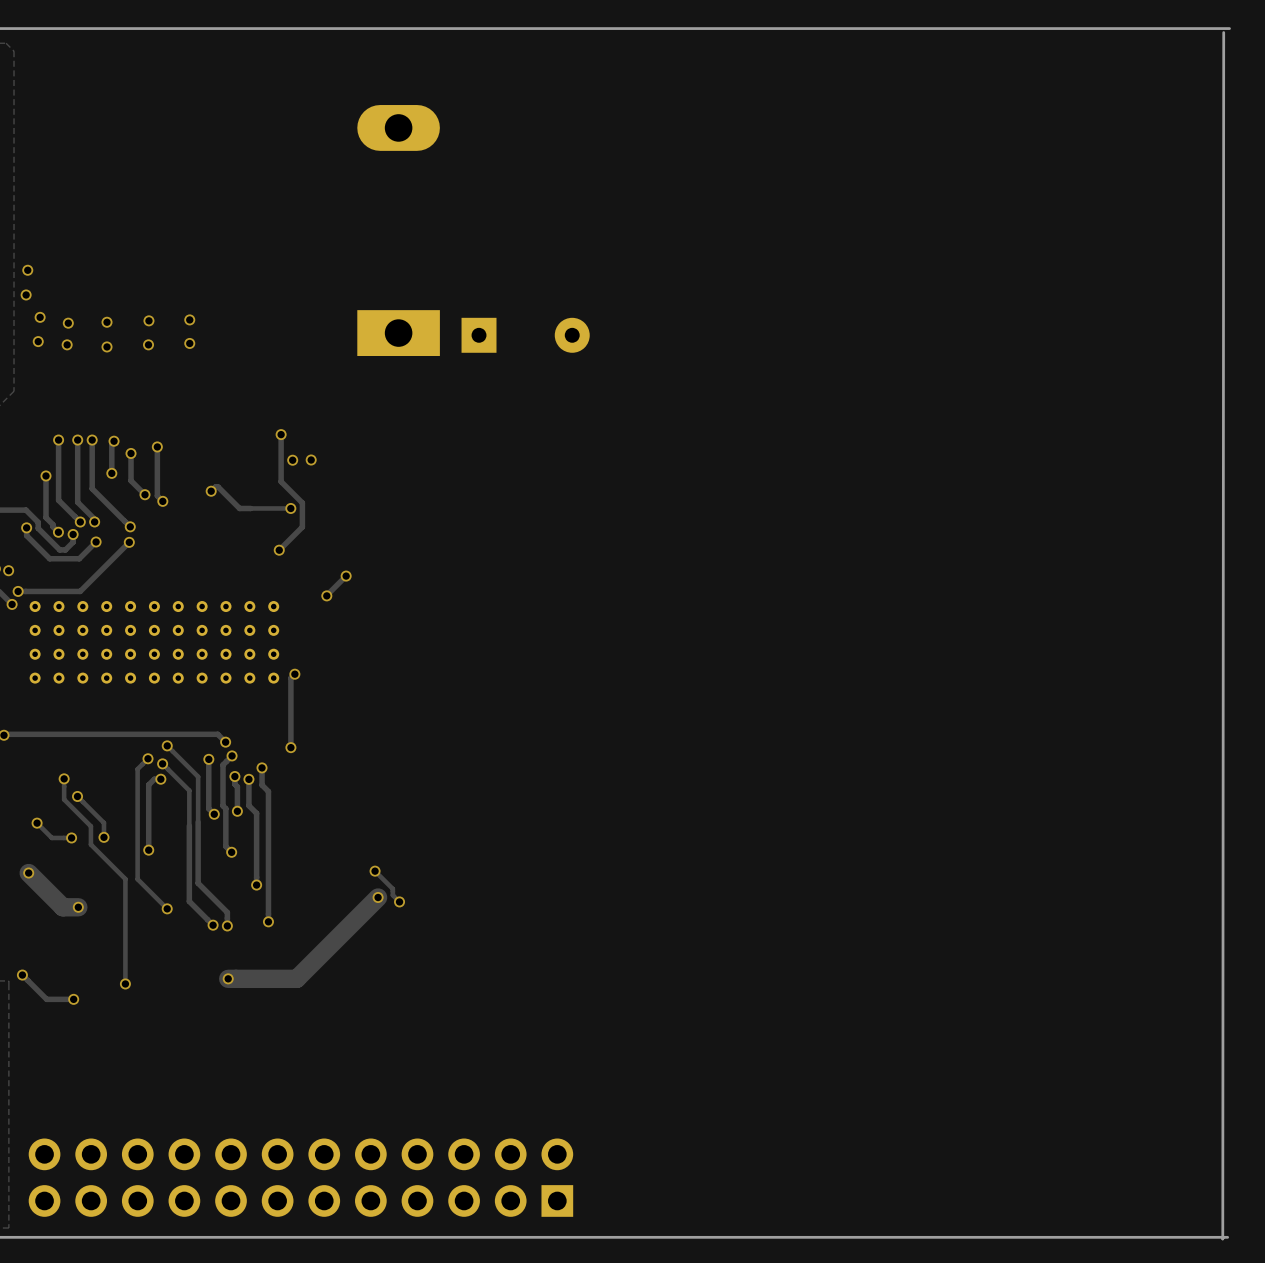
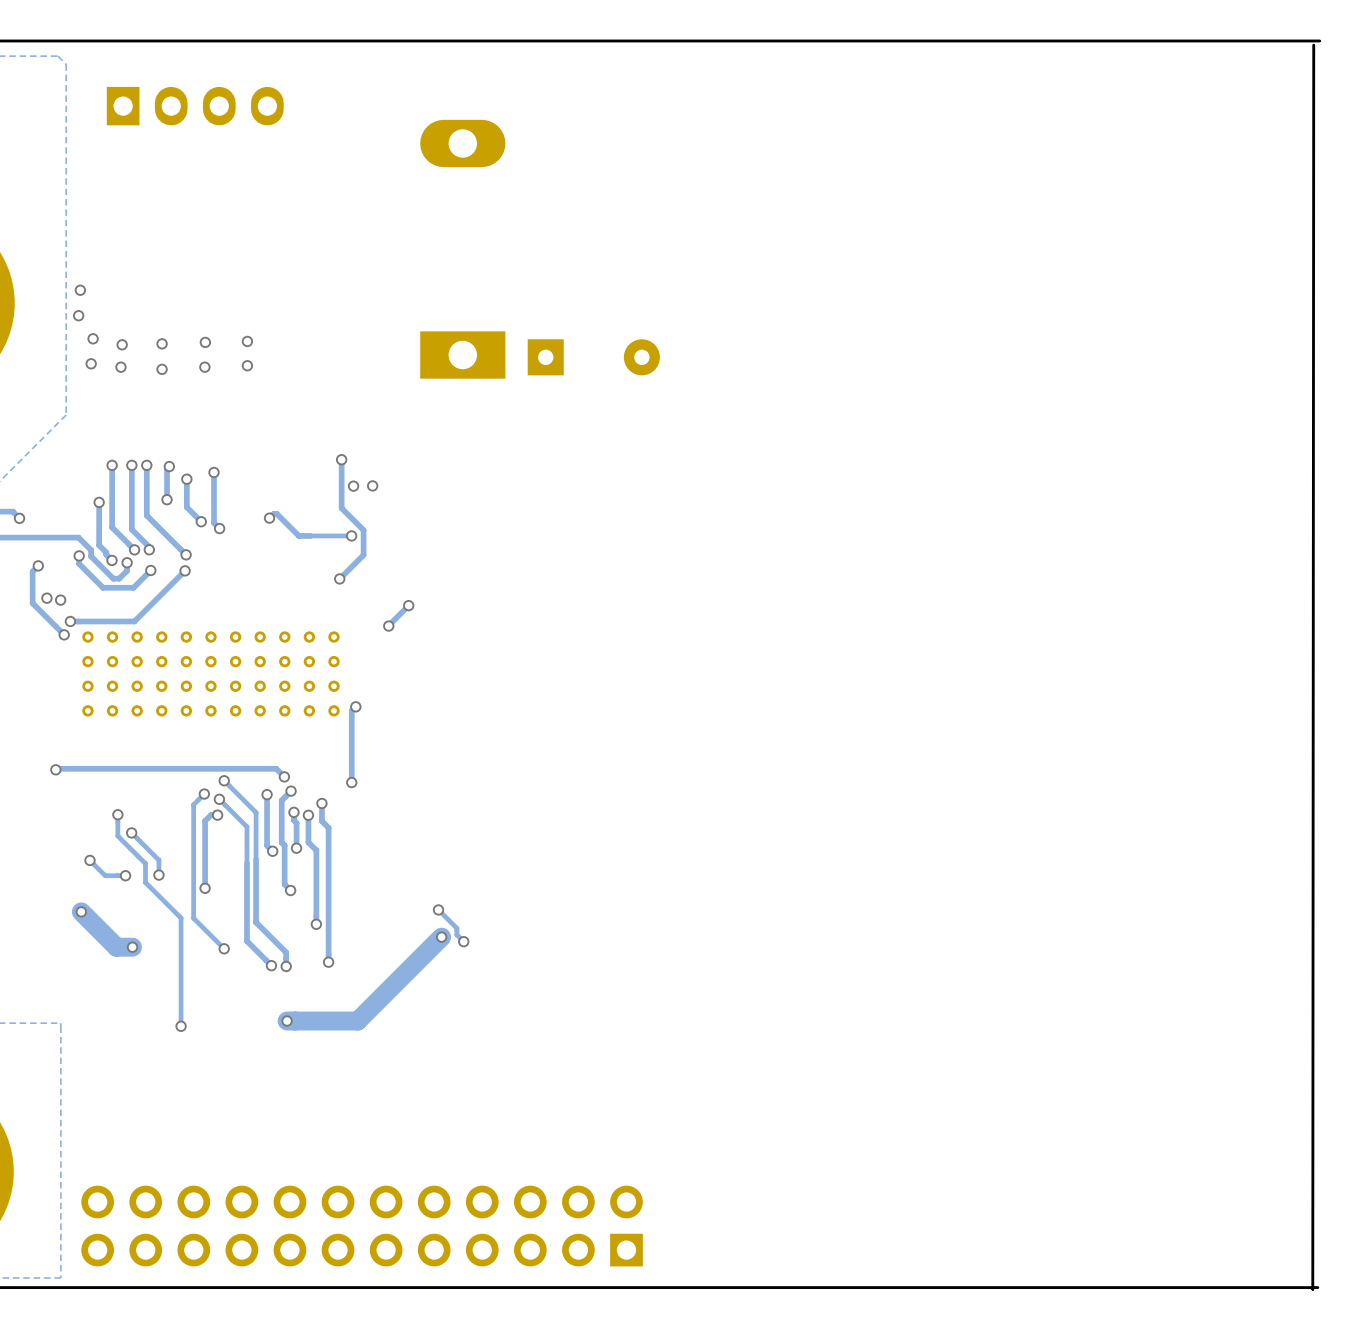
part: none -> (195, 106)
track: (22, 975) (46, 999) (73, 999) -> none
via: (22, 975) -> none
via: (73, 999) -> none

